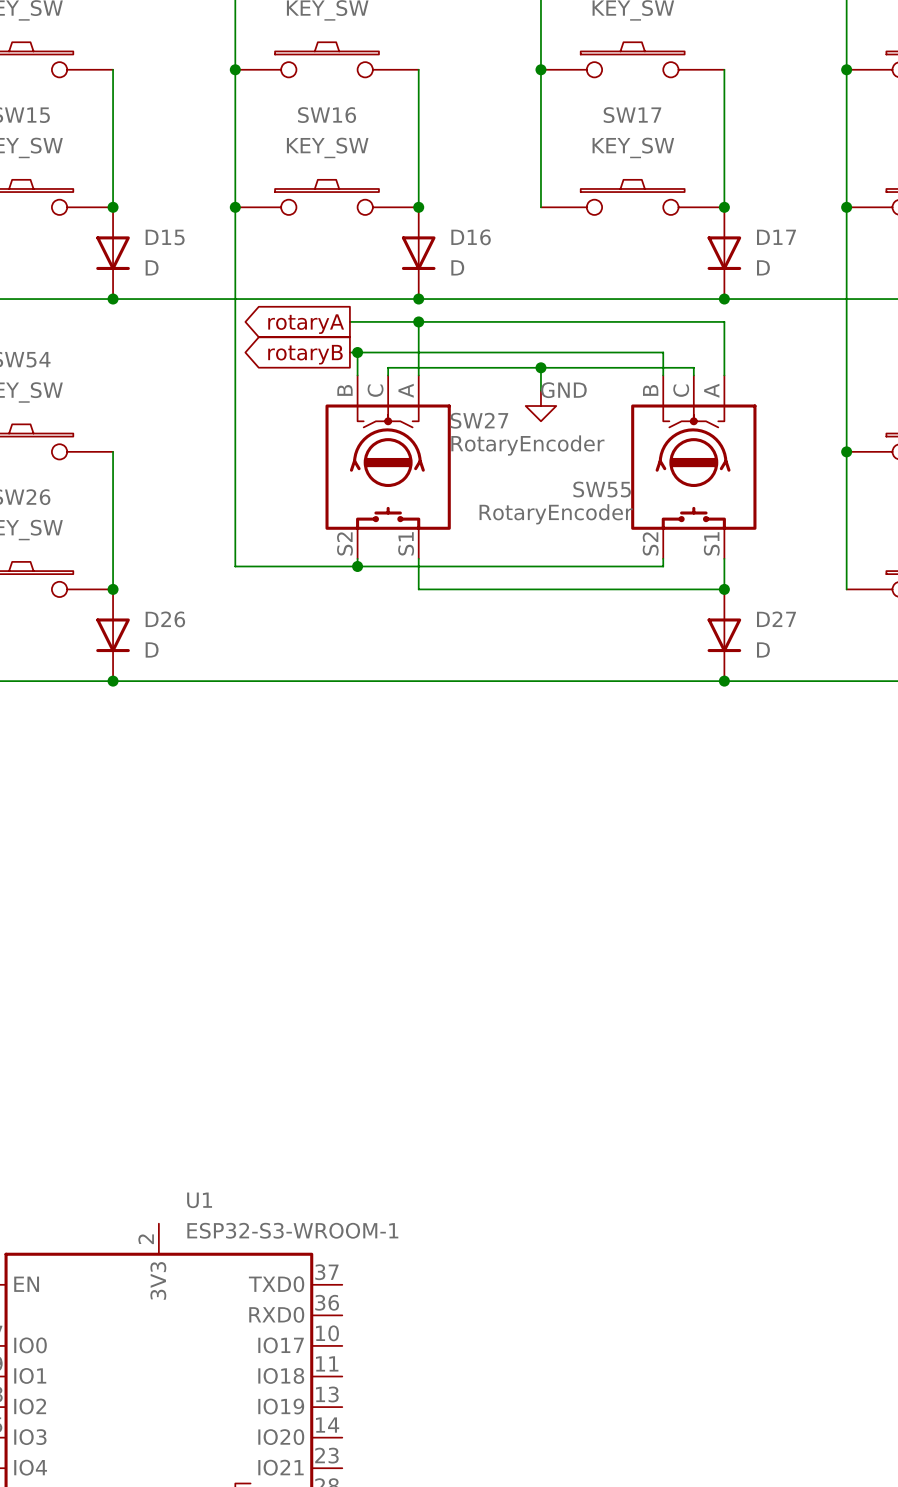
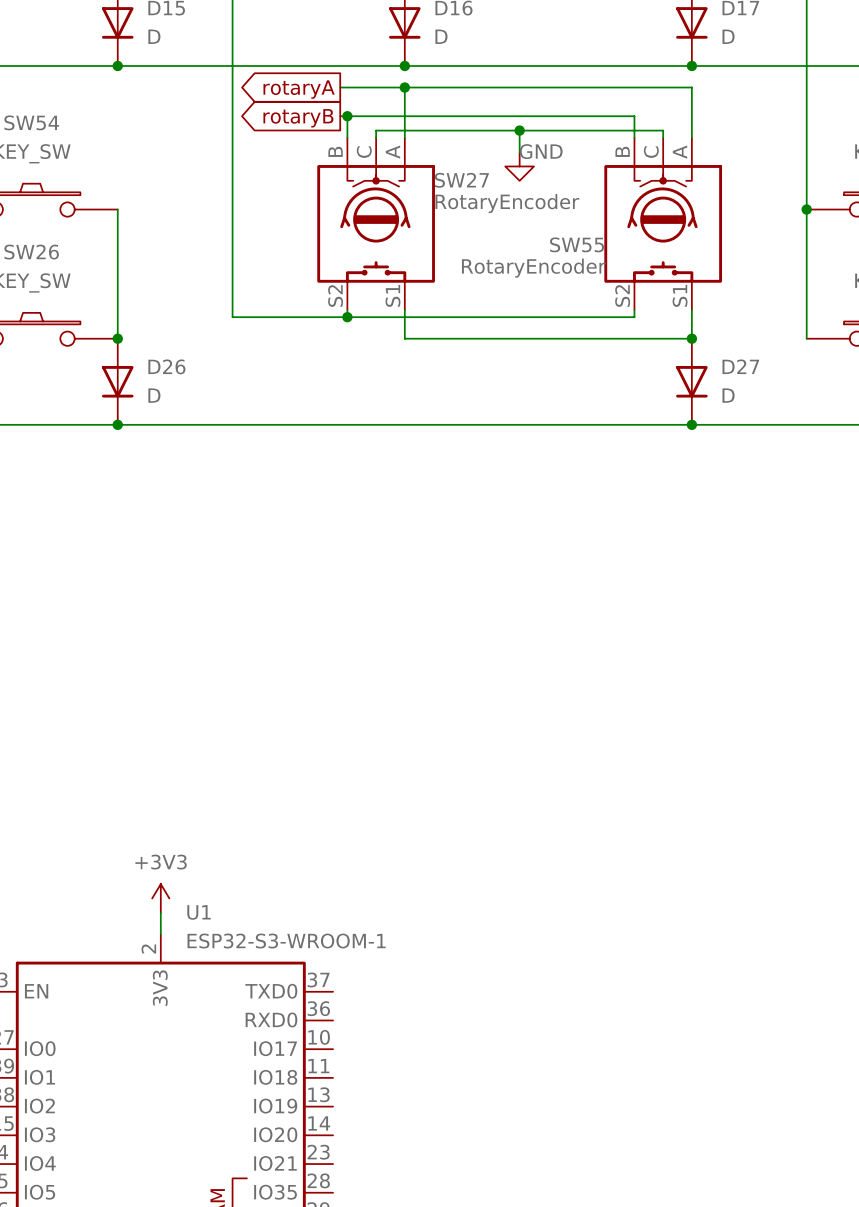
power symbol: none -> +3V3 (160, 898)
wire: none -> (160, 912) (160, 934)

